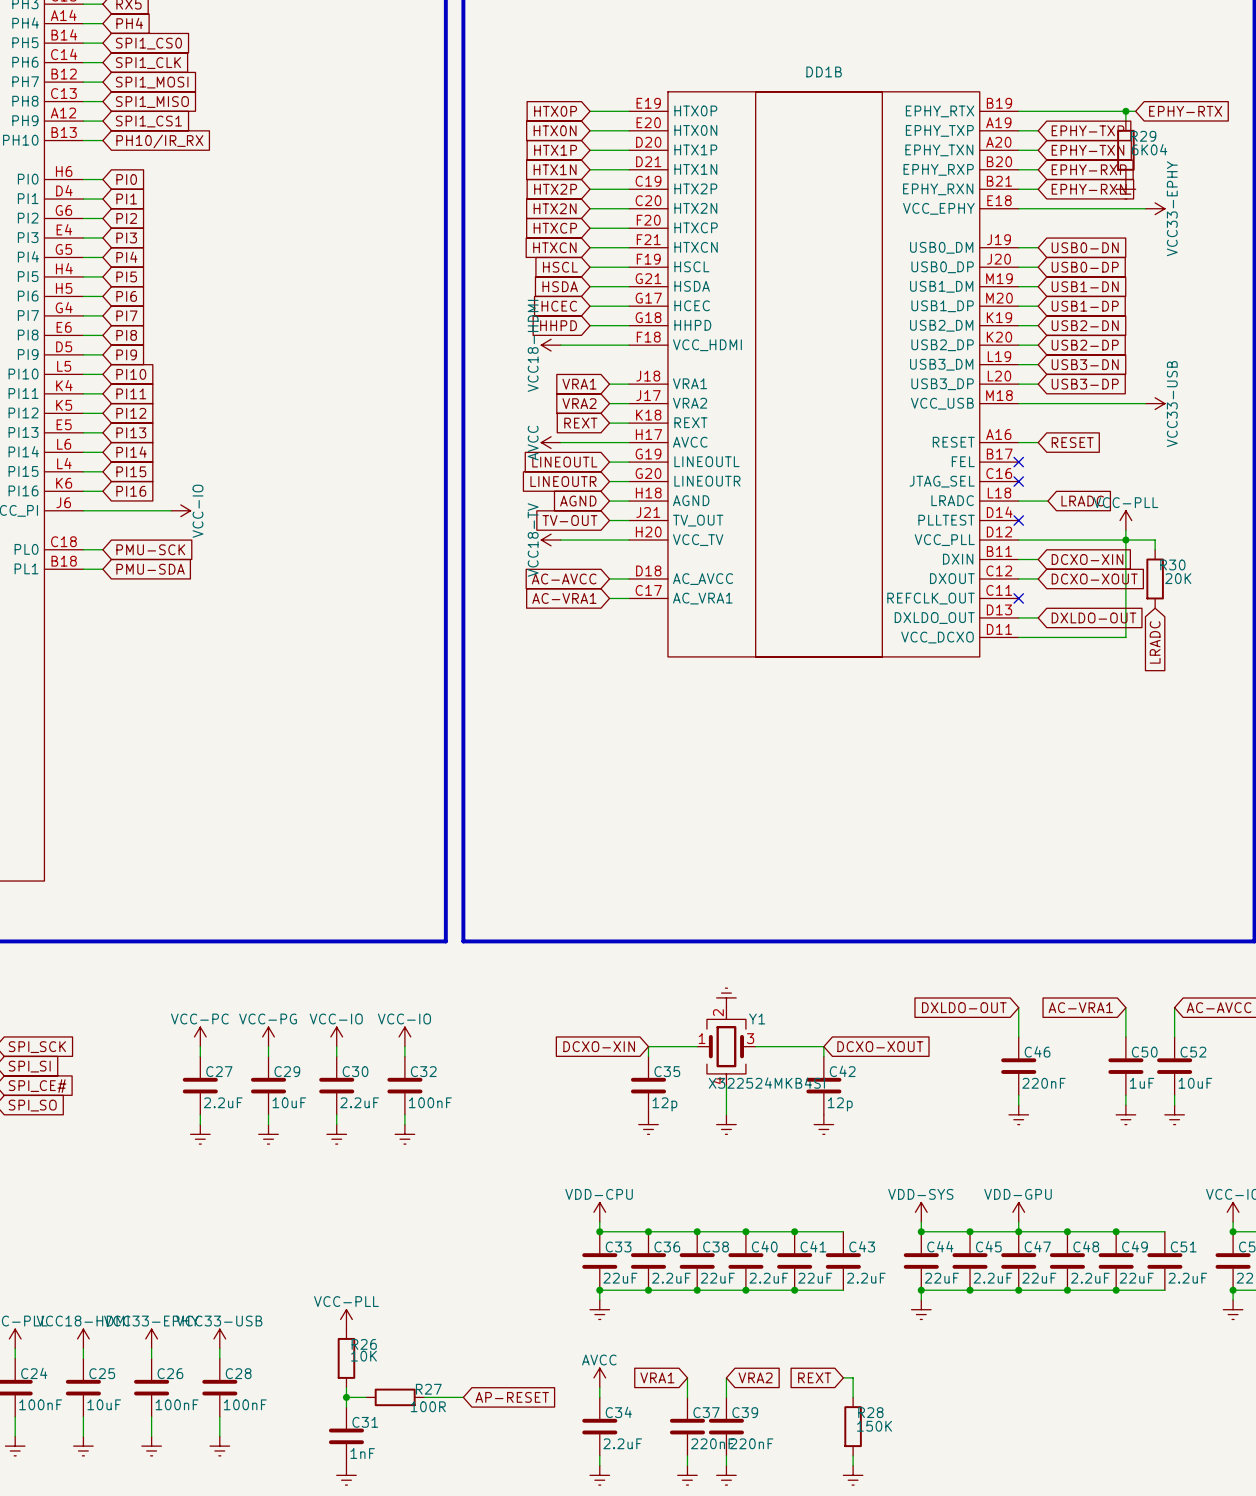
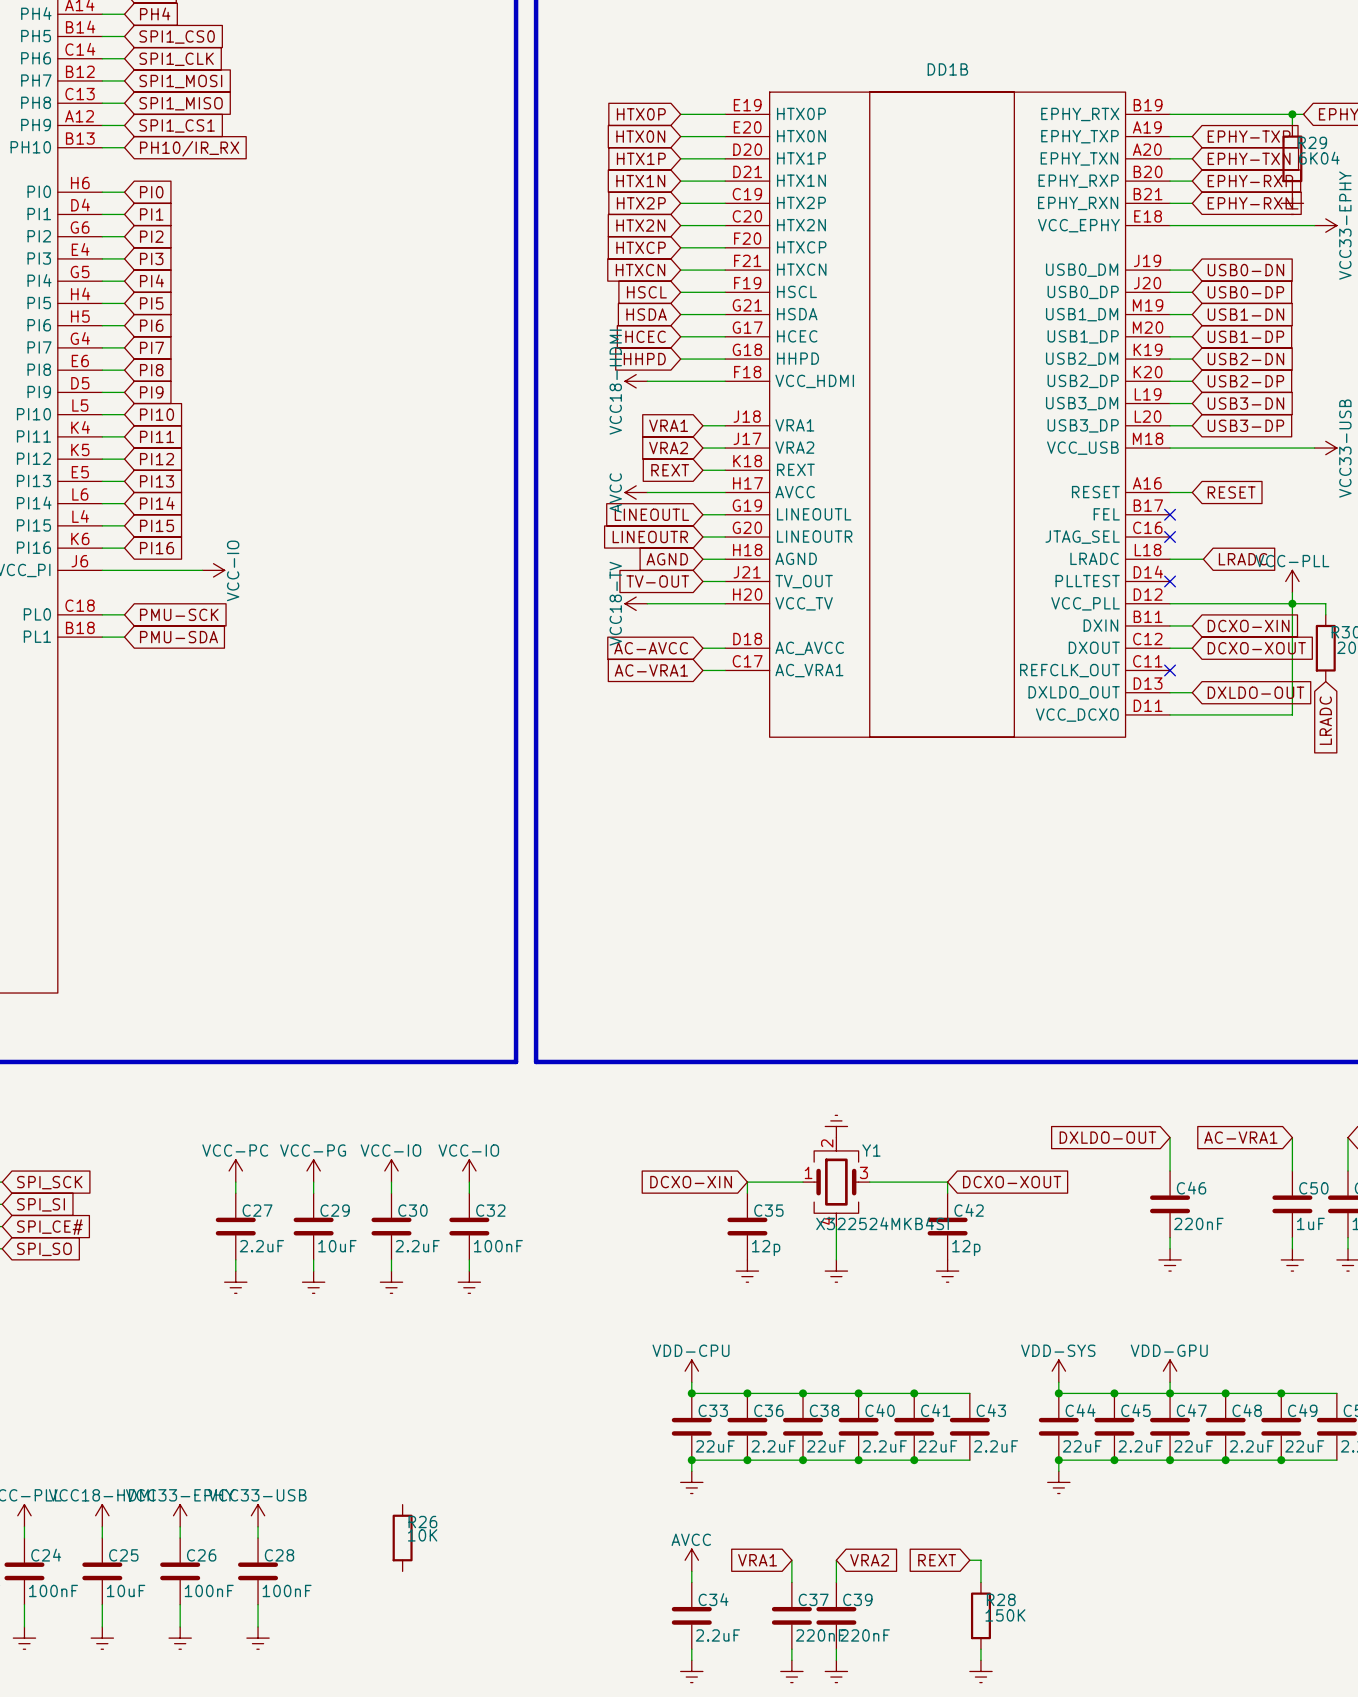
power symbol: VCC-PLL (346, 1319) -> none
wire: (346, 1387) (346, 1407) -> none
wire: (346, 1397) (365, 1397) -> none
junction: (346, 1397) -> none
R27: 100R (395, 1397) -> none
wire: (424, 1397) (463, 1397) -> none
global label: AP-RESET (512, 1397) -> none
C31: 1nF (346, 1436) -> none
power symbol: (346, 1475) -> none

